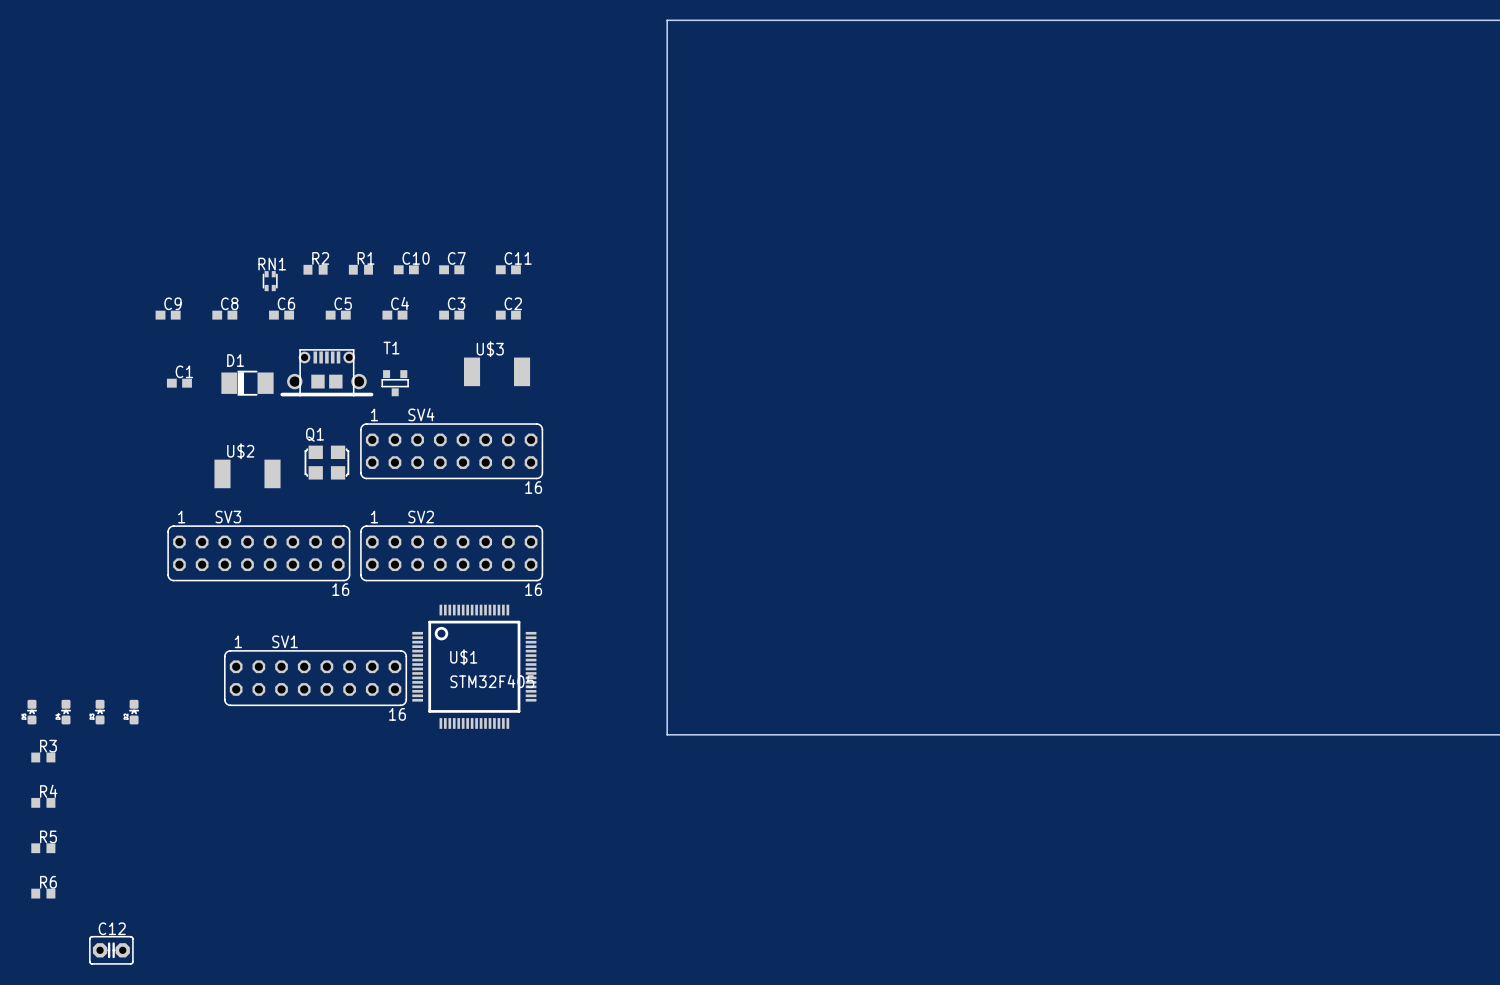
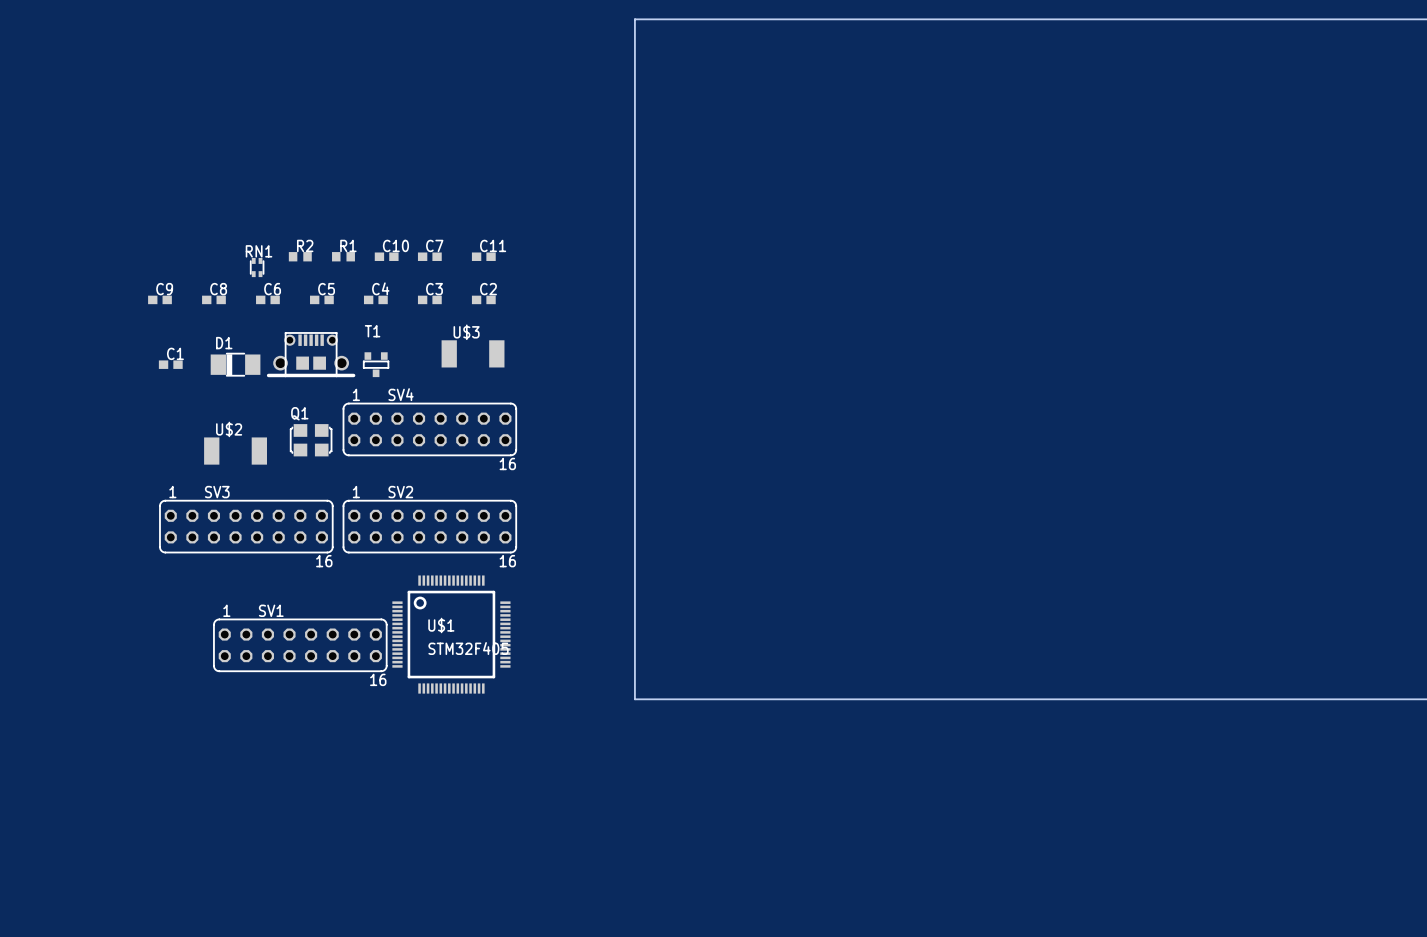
part: (31, 712) -> none
part: (66, 712) -> none
part: (100, 712) -> none
part: (134, 712) -> none
R3: (43, 757) -> none
R4: (43, 802) -> none
R5: (43, 848) -> none
R6: (43, 893) -> none
C12: (111, 950) -> none

